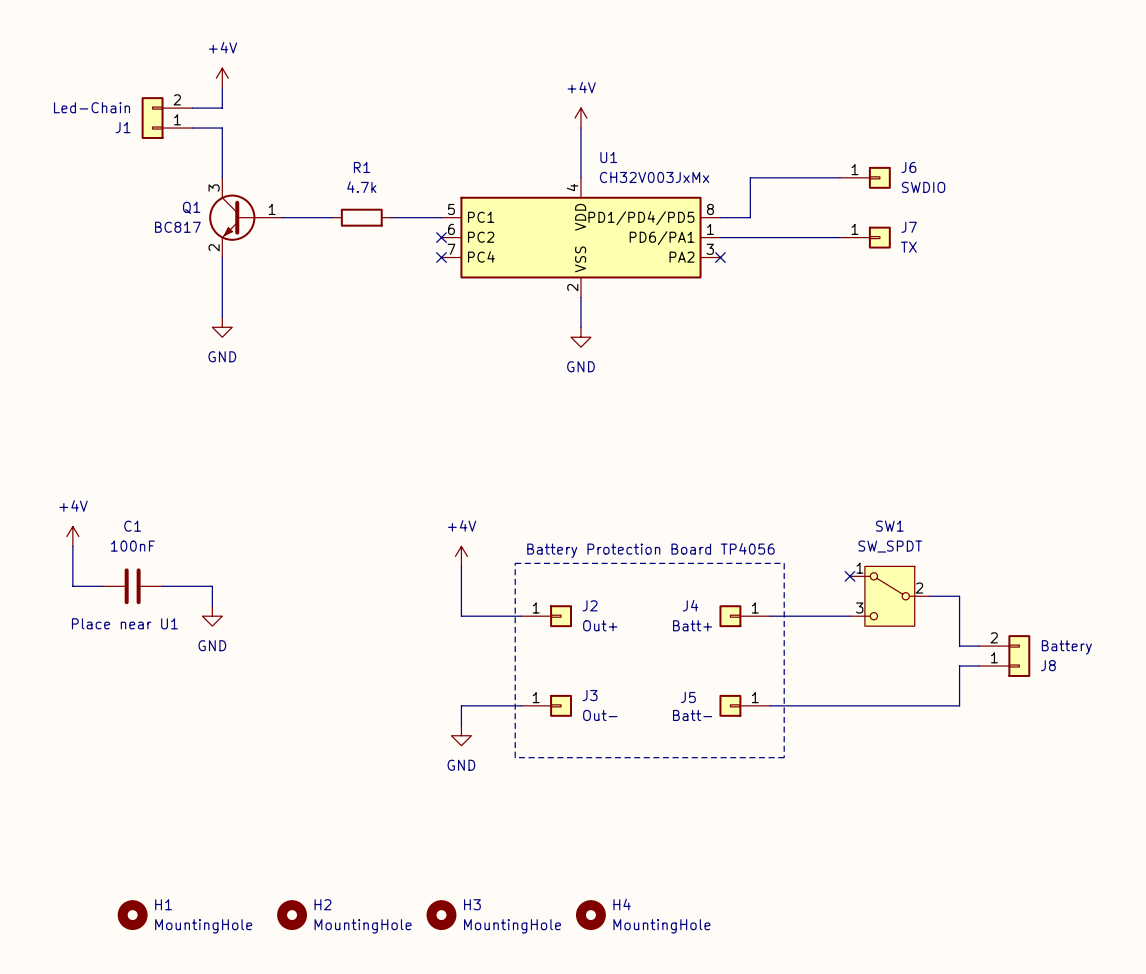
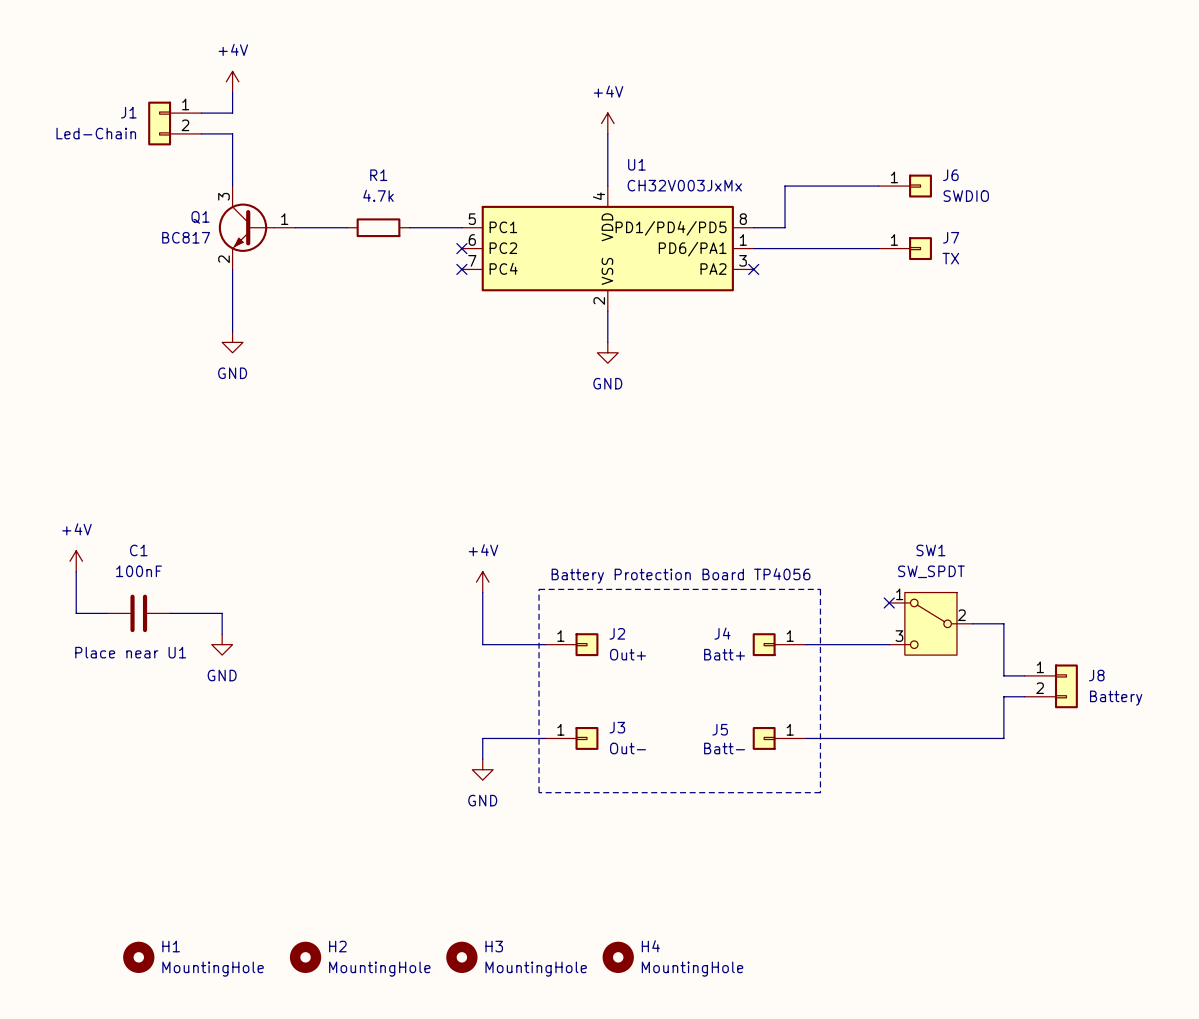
J1 flip: as is (152, 118) -> up-down (159, 123)
J8 flip: as is (1019, 656) -> up-down (1066, 686)

